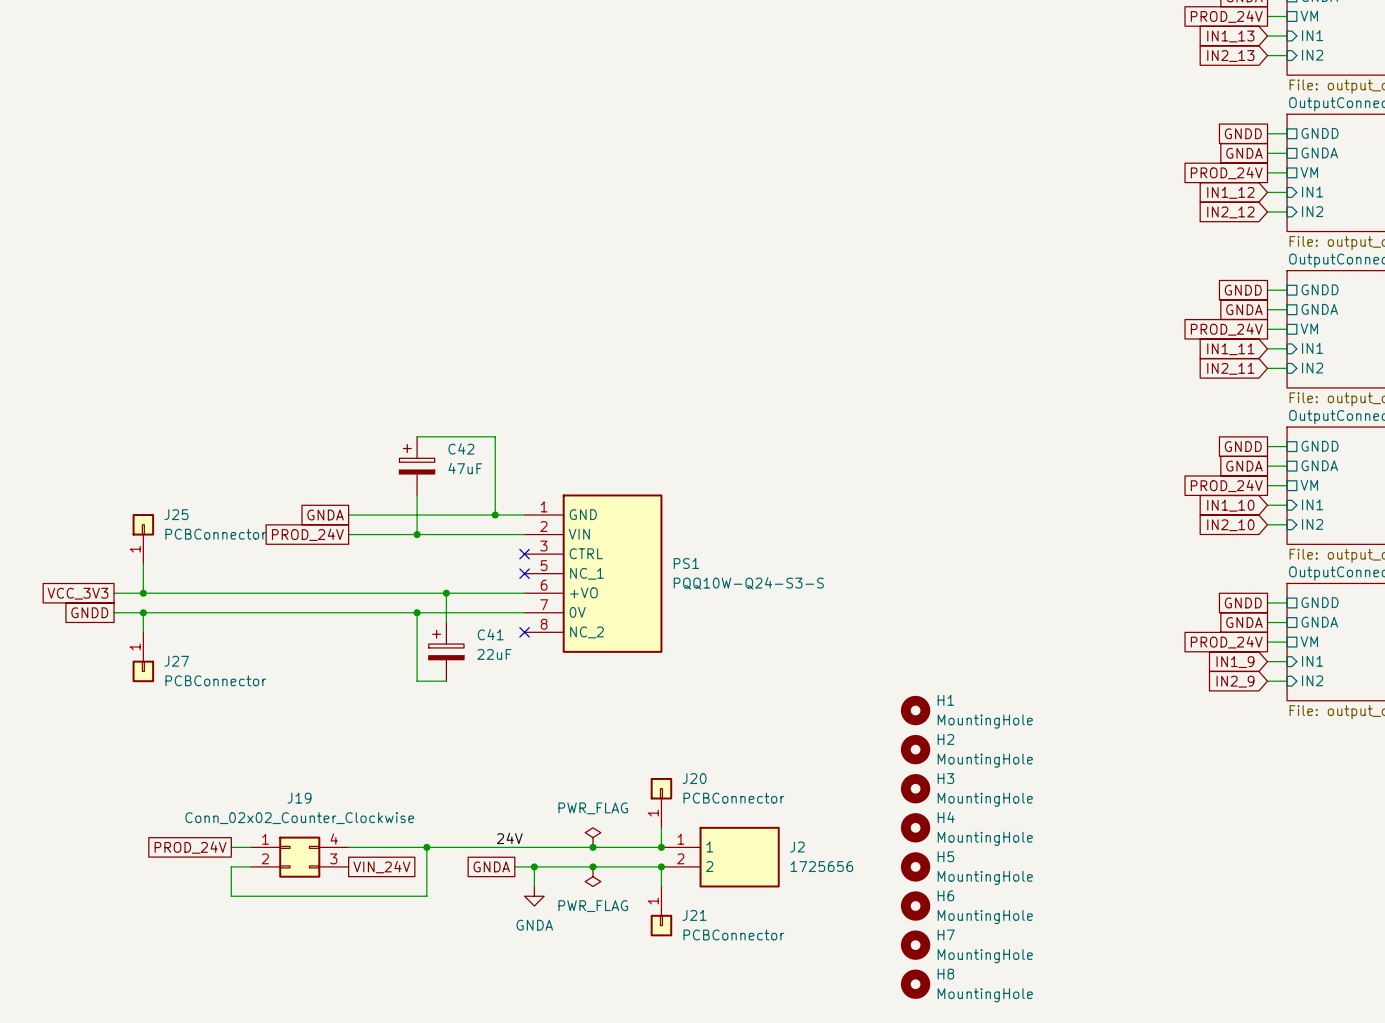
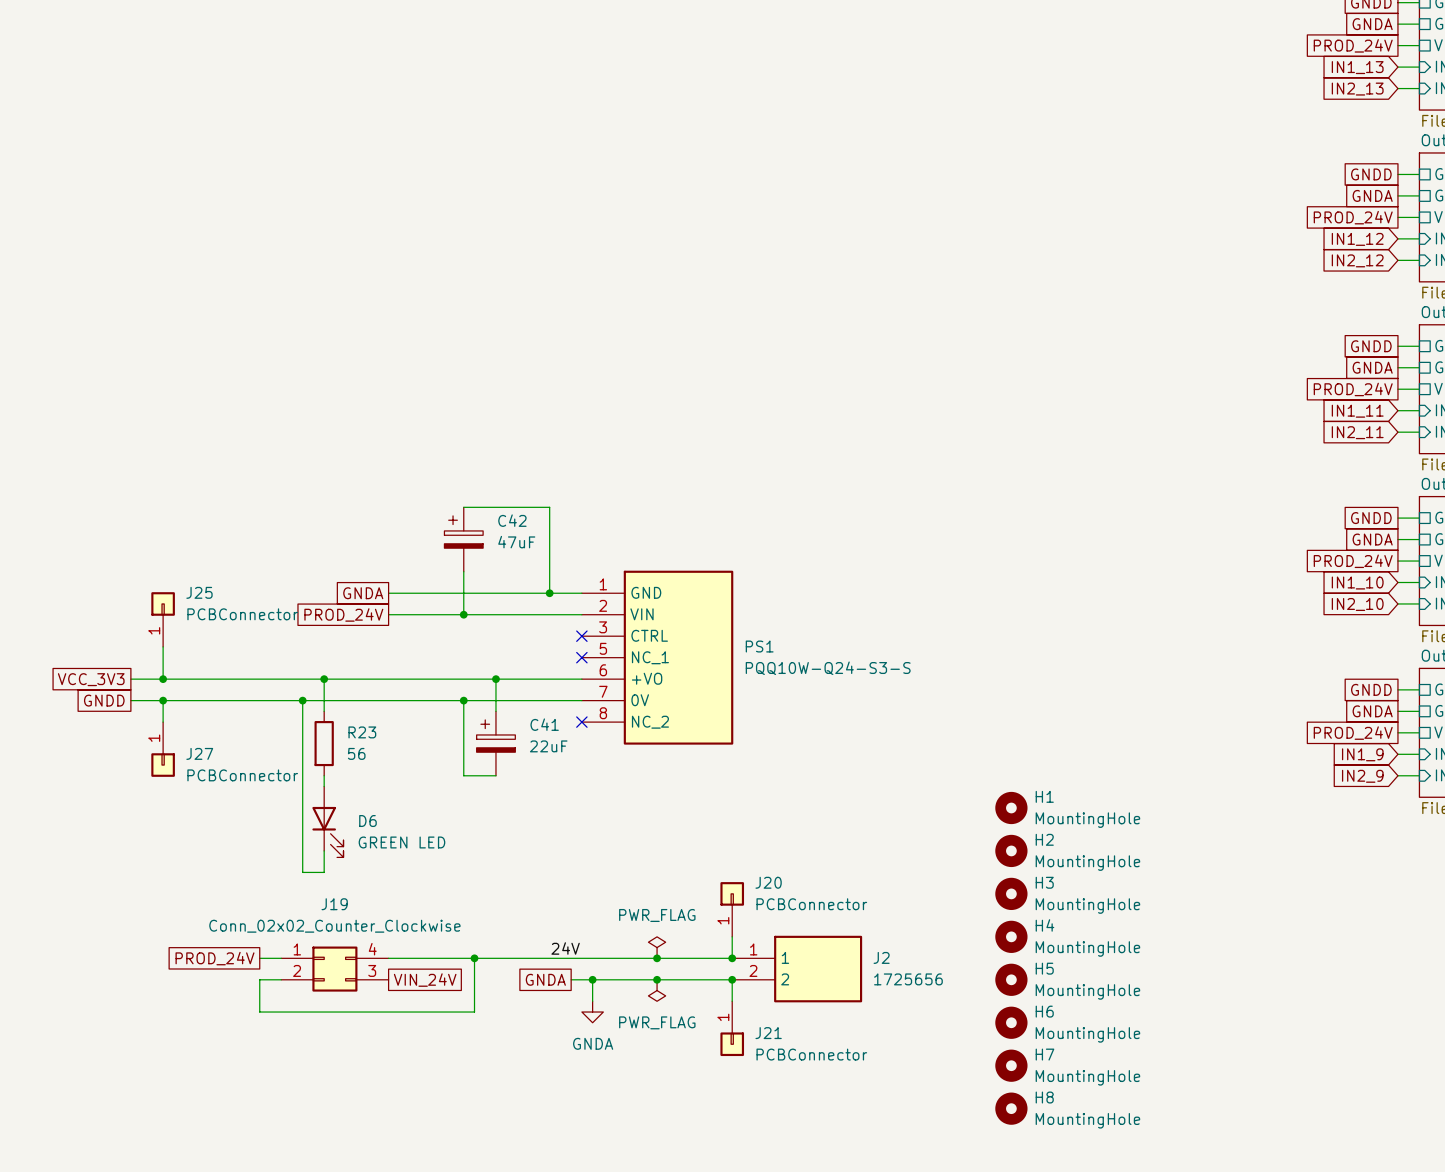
wire: none -> (324, 679) (324, 711)
junction: none -> (324, 679)
wire: none -> (302, 700) (302, 872) (324, 872) (324, 850)
junction: none -> (302, 700)
R23: none -> 56 (324, 743)
wire: none -> (324, 775) (324, 786)
D6: none -> GREEN LED (327, 821)

